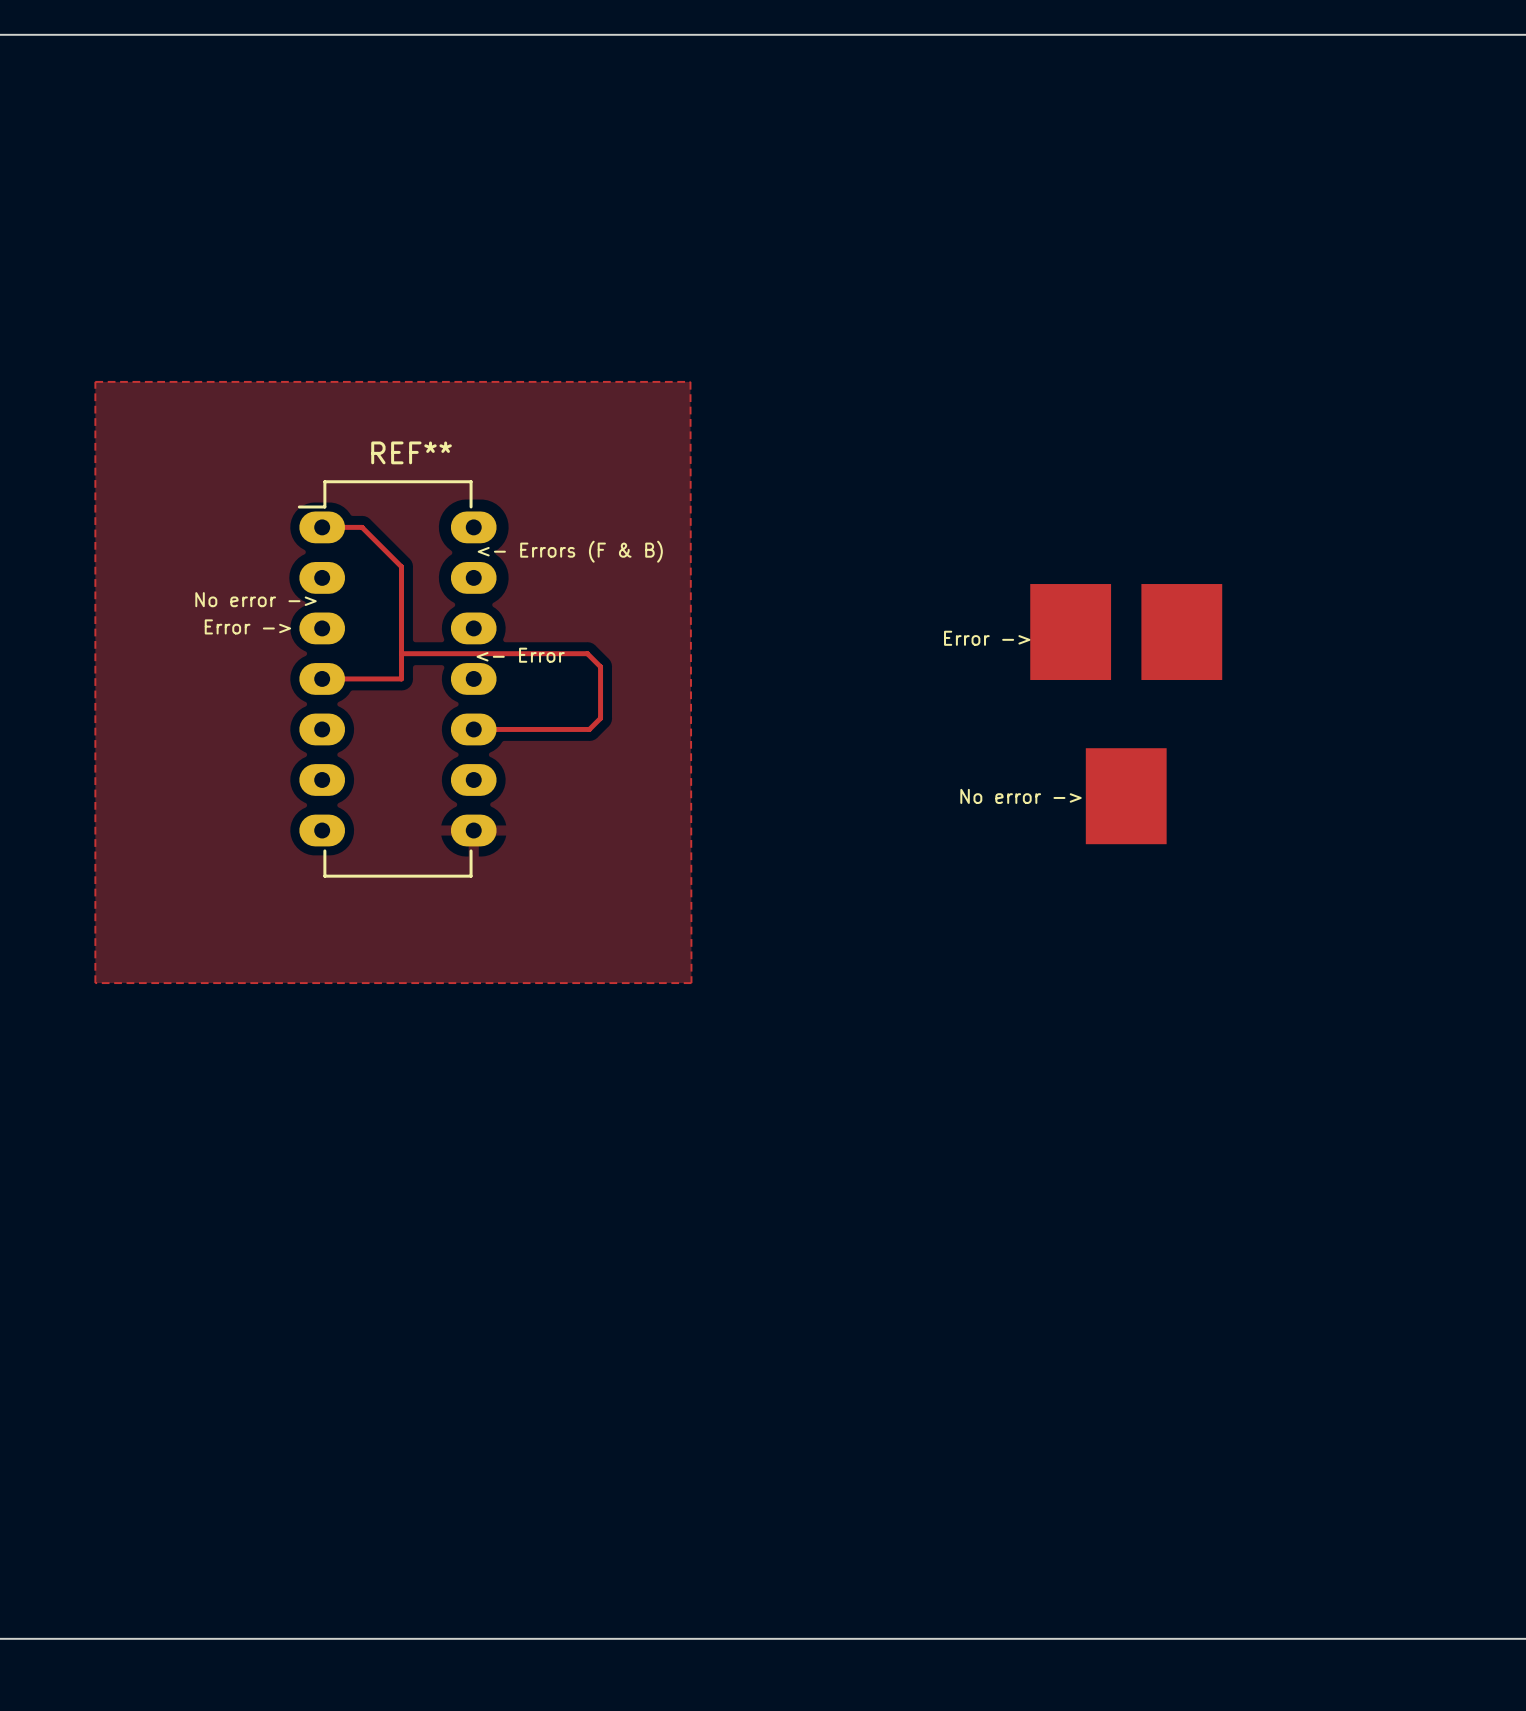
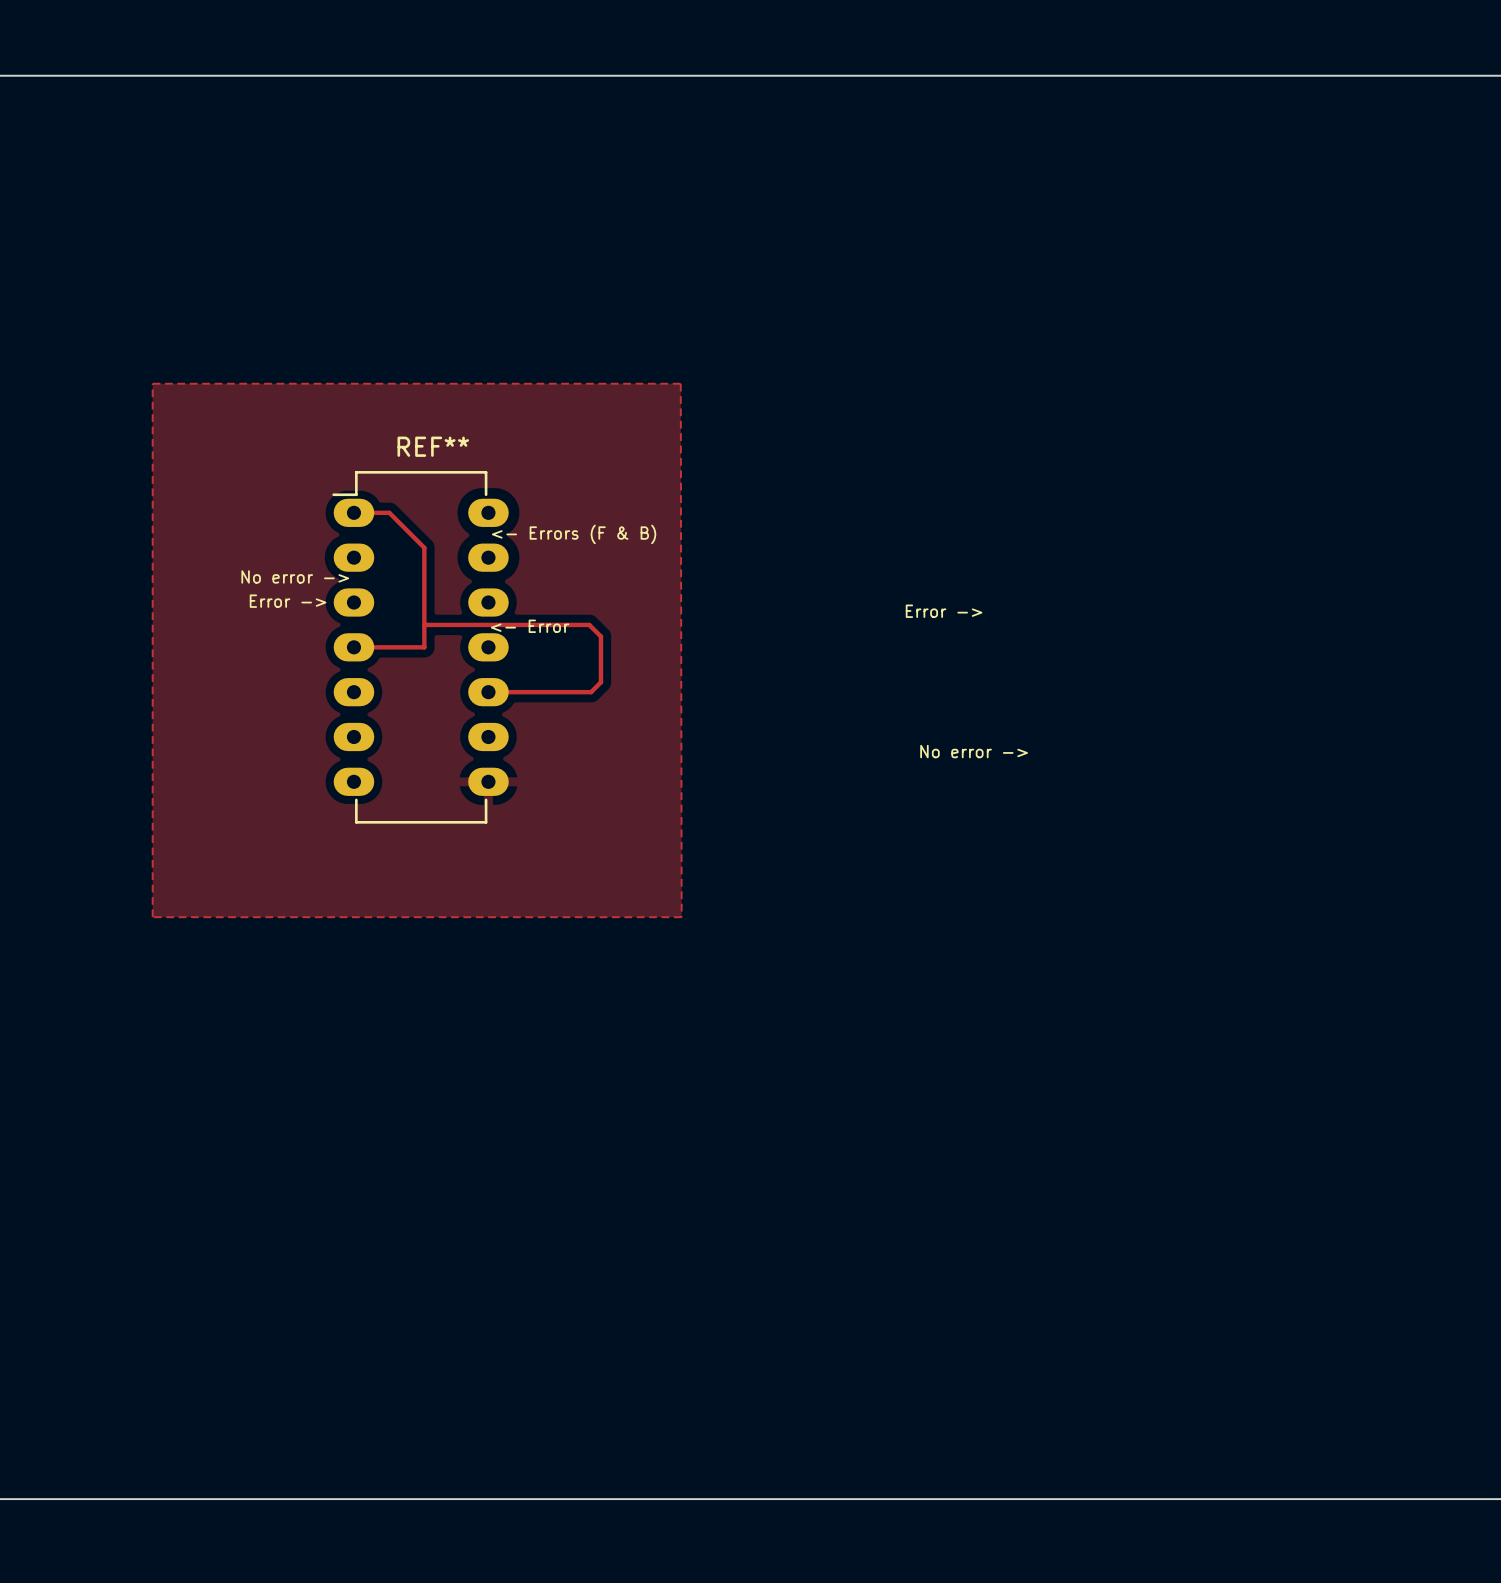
drawing: [1030, 584, 1223, 845] -> none

